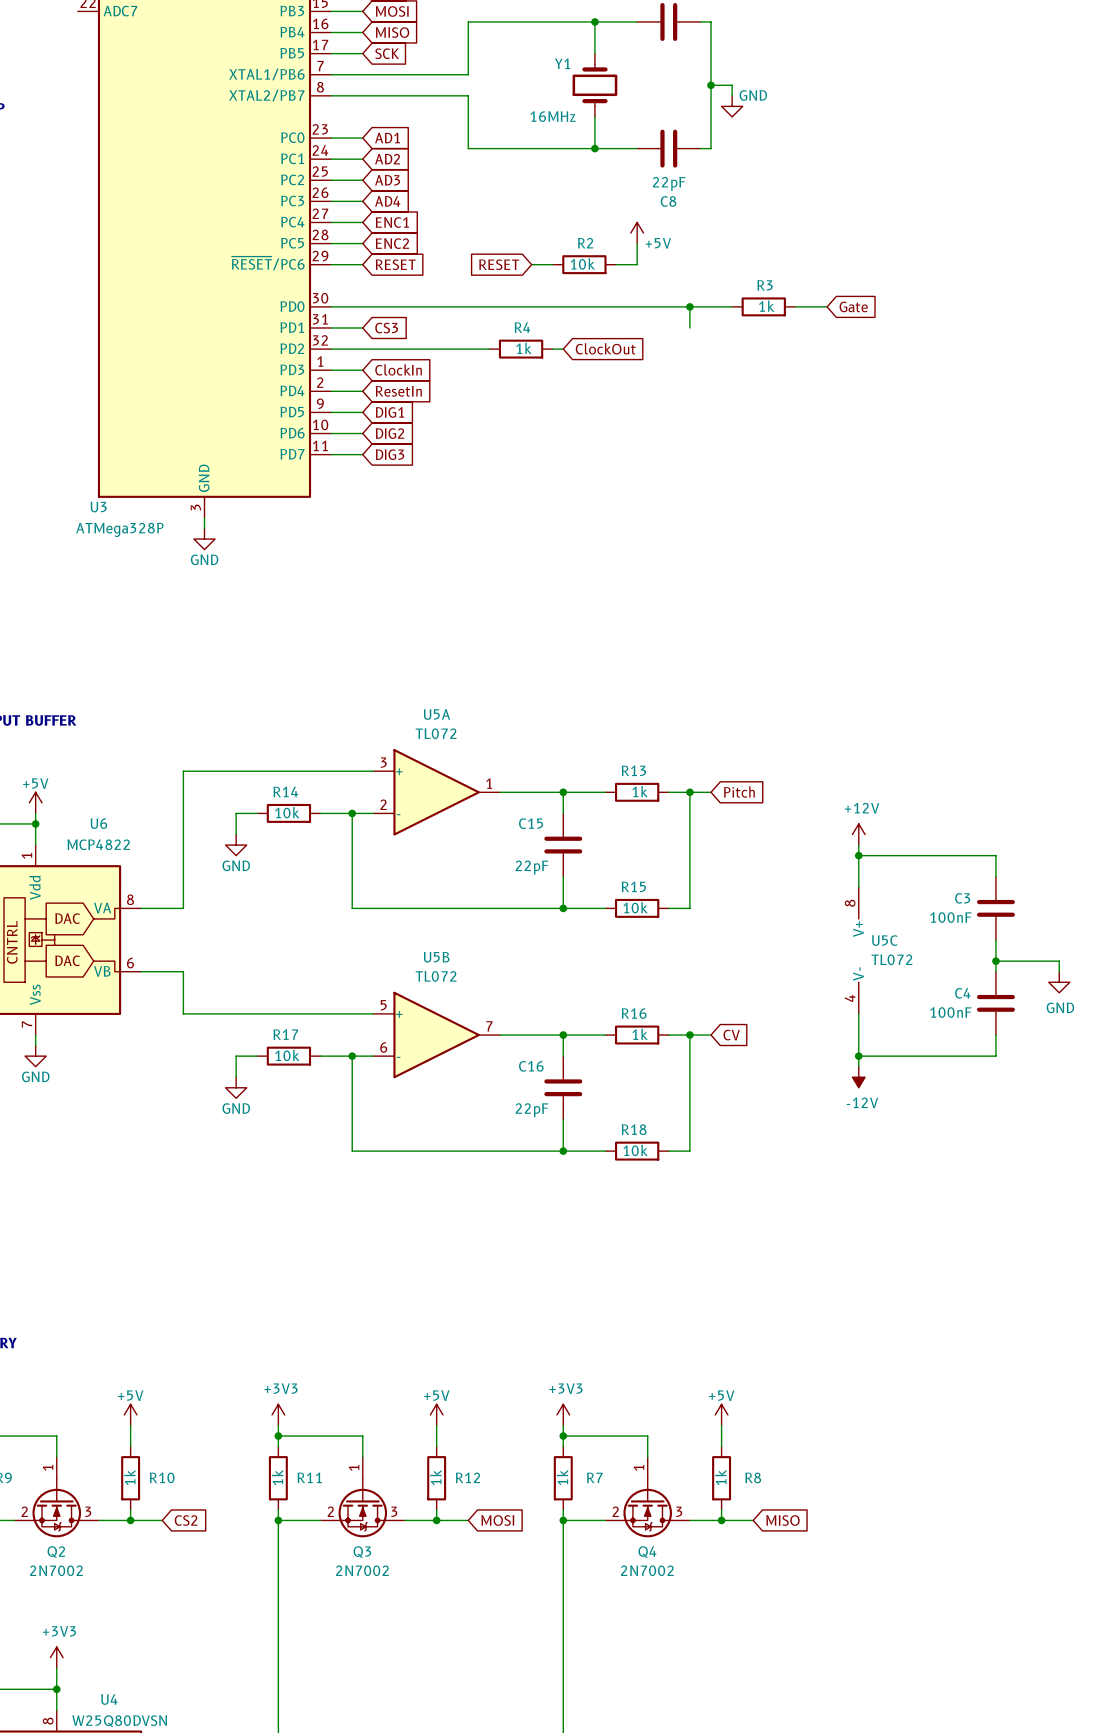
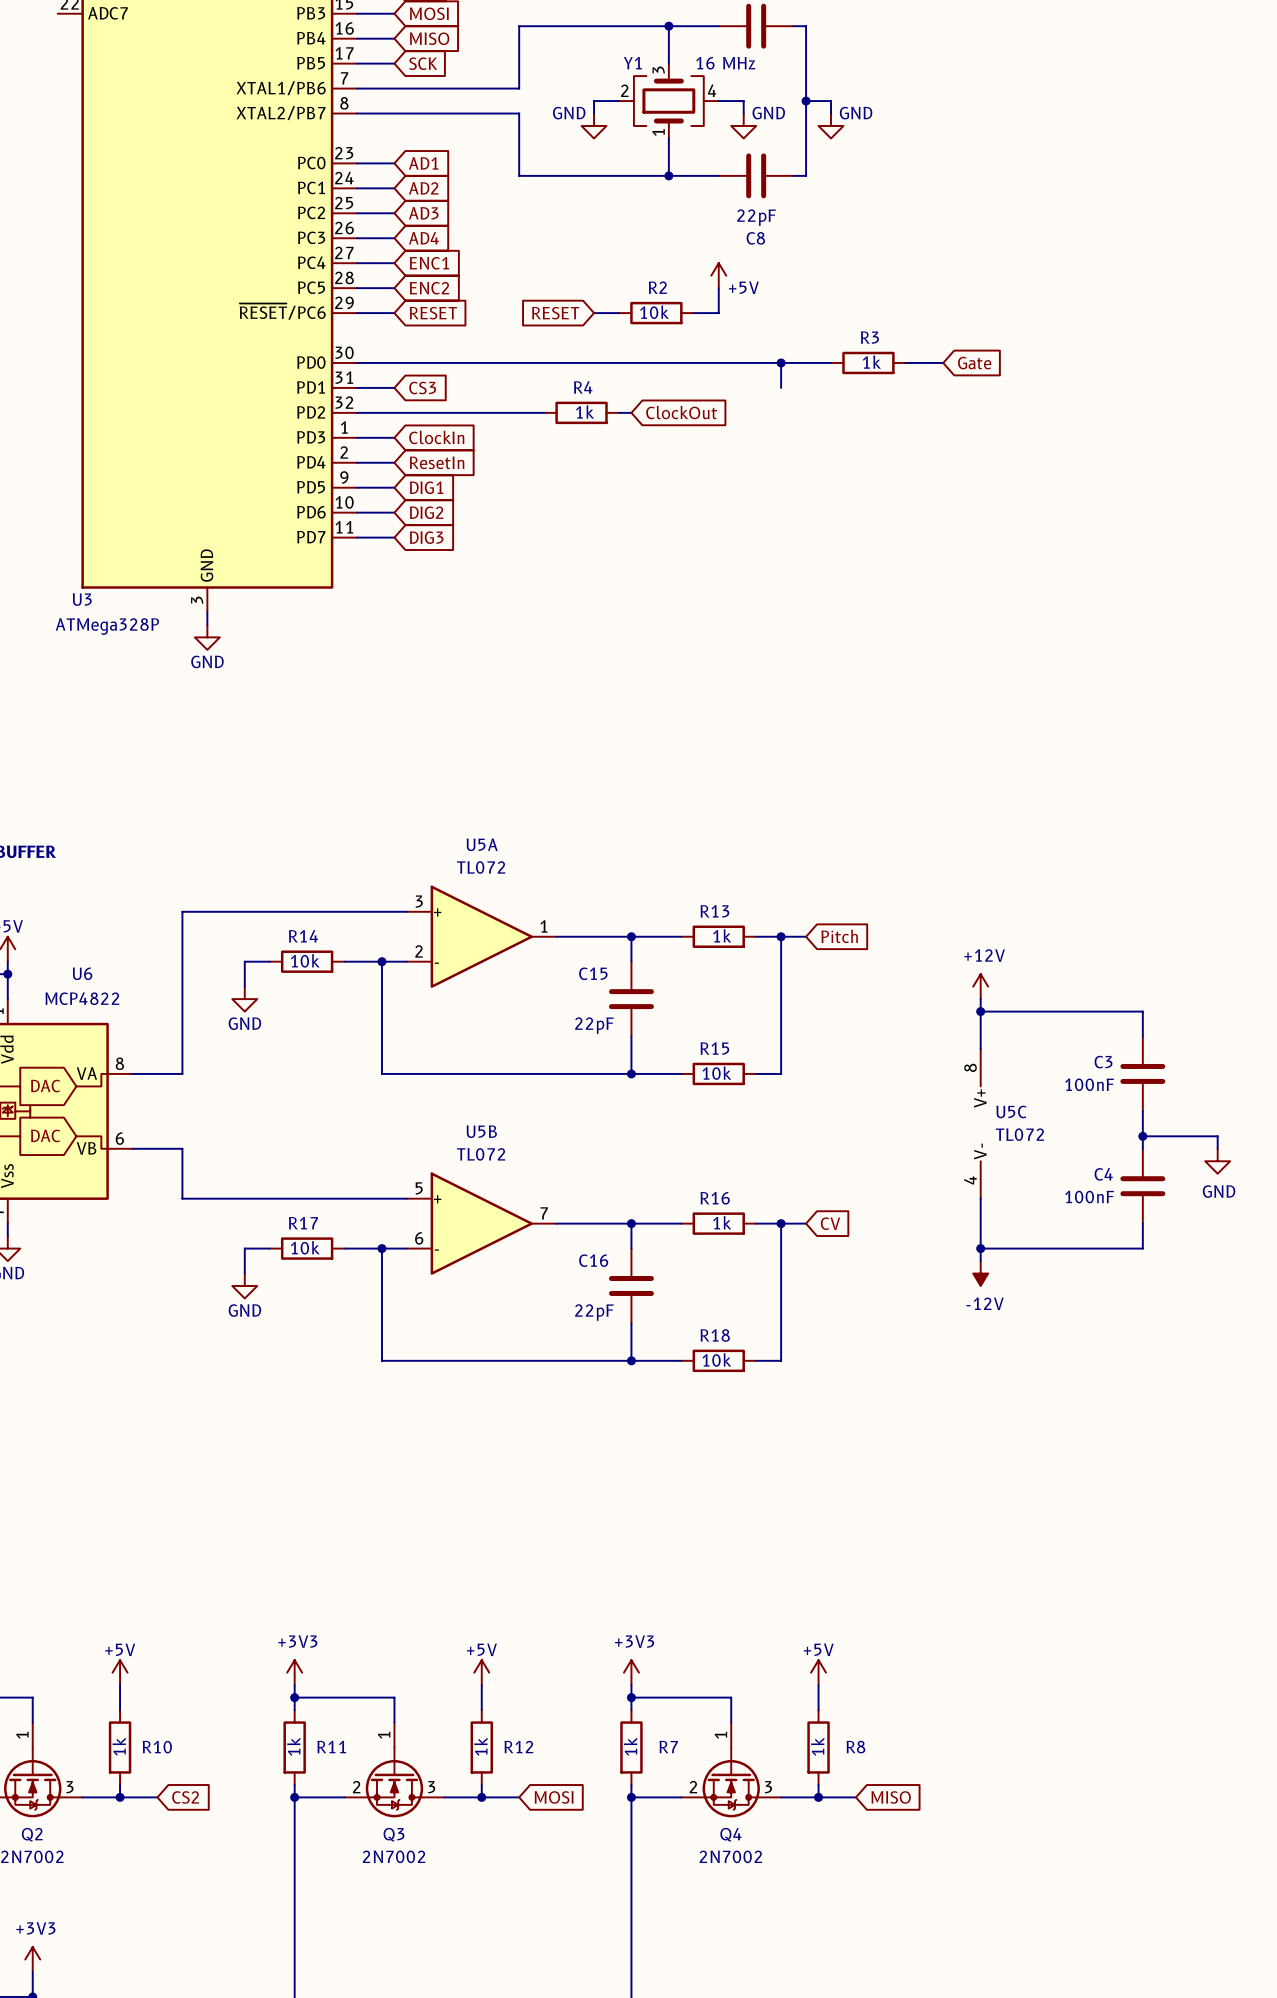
Y1 symbol: [572, 53, 618, 117] -> [618, 63, 719, 139]
wire: none -> (618, 101) (594, 101) (594, 113)
wire: none -> (718, 101) (743, 101) (743, 113)
power symbol: none -> GND (594, 125)
power symbol: none -> GND (743, 125)
Y1 value: 16MHz (553, 116) -> 16 MHz (725, 63)

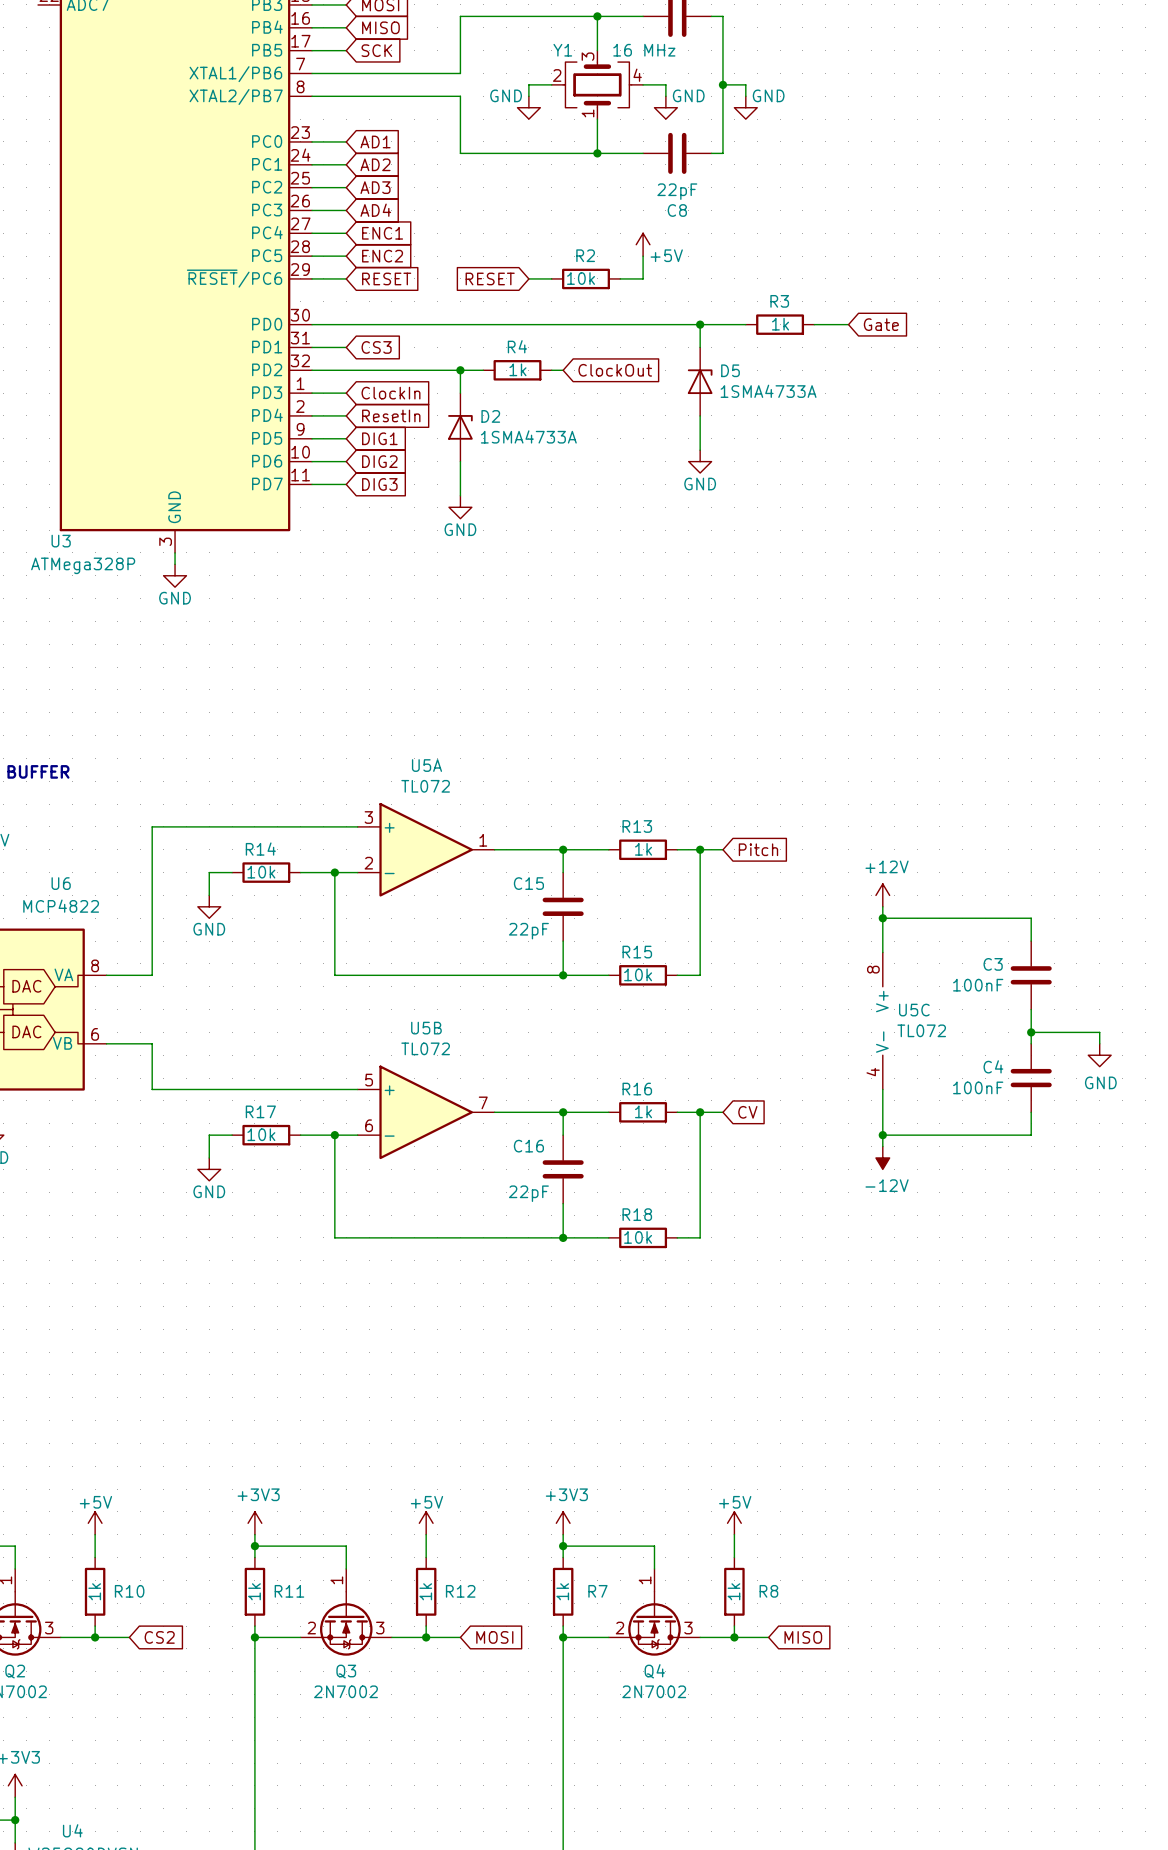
wire: none -> (460, 370) (460, 393)
junction: none -> (460, 370)
D5: none -> 1SMA4733A (700, 381)
wire: none -> (700, 415) (700, 450)
D2: none -> 1SMA4733A (460, 427)
wire: none -> (460, 461) (460, 495)
power symbol: none -> GND (700, 461)
power symbol: none -> GND (460, 507)

